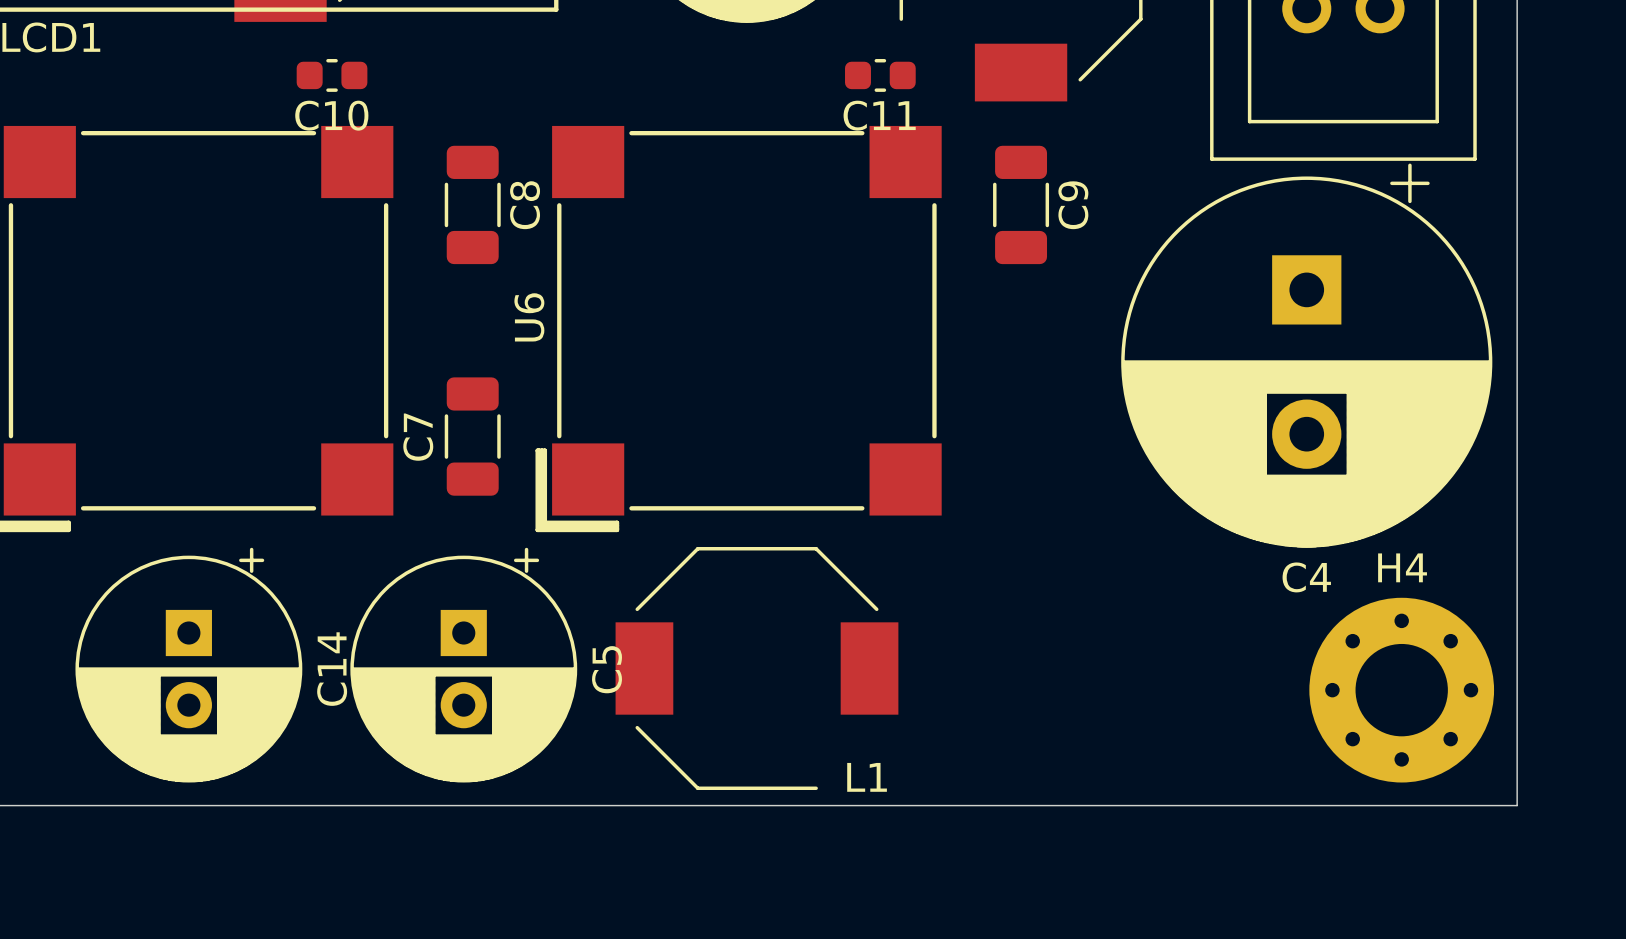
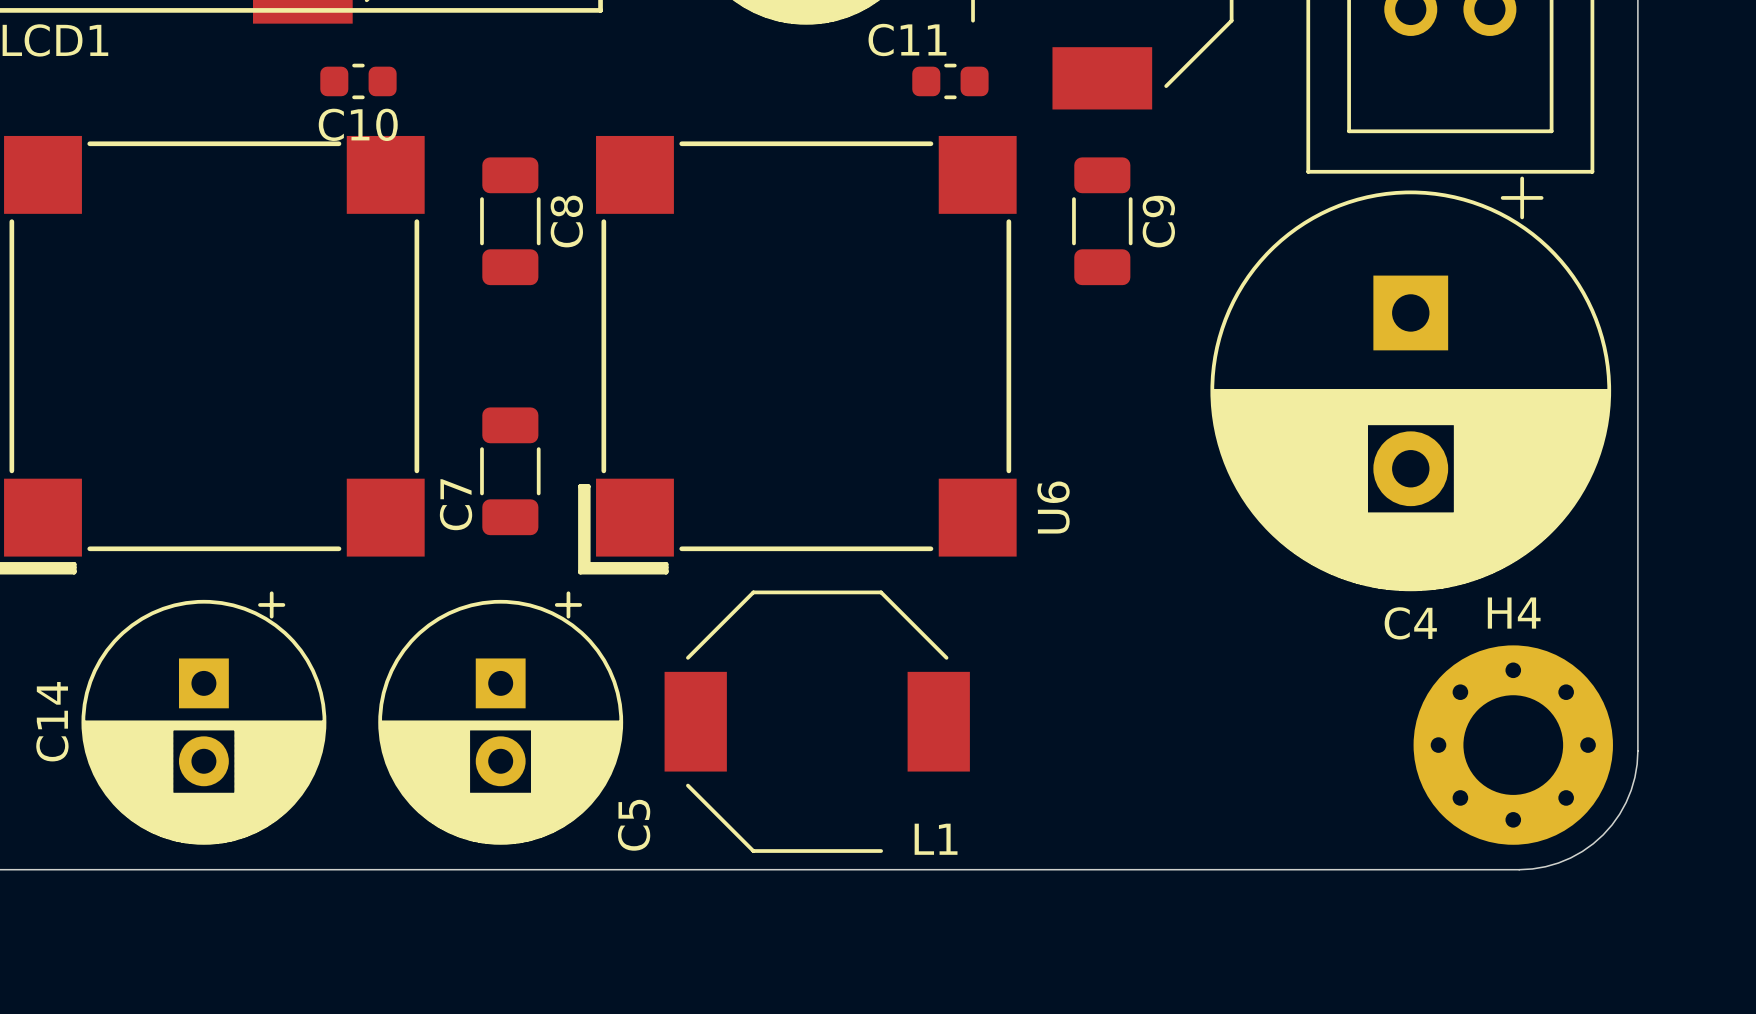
C11 name position: C11 (879, 115) -> C11 (907, 39)
U6 name position: U6 (529, 317) -> U6 (1053, 507)
C7 name position: C7 (418, 437) -> C7 (456, 504)
C14 name position: C14 (332, 669) -> C14 (52, 721)
C5 name position: C5 (607, 669) -> C5 (634, 825)
board edge: (1517, 695) (1517, 805) (1407, 805) -> (1637, 750) (1634, 777) (1626, 802) (1603, 834) (1570, 857) (1545, 866) (1519, 869)

